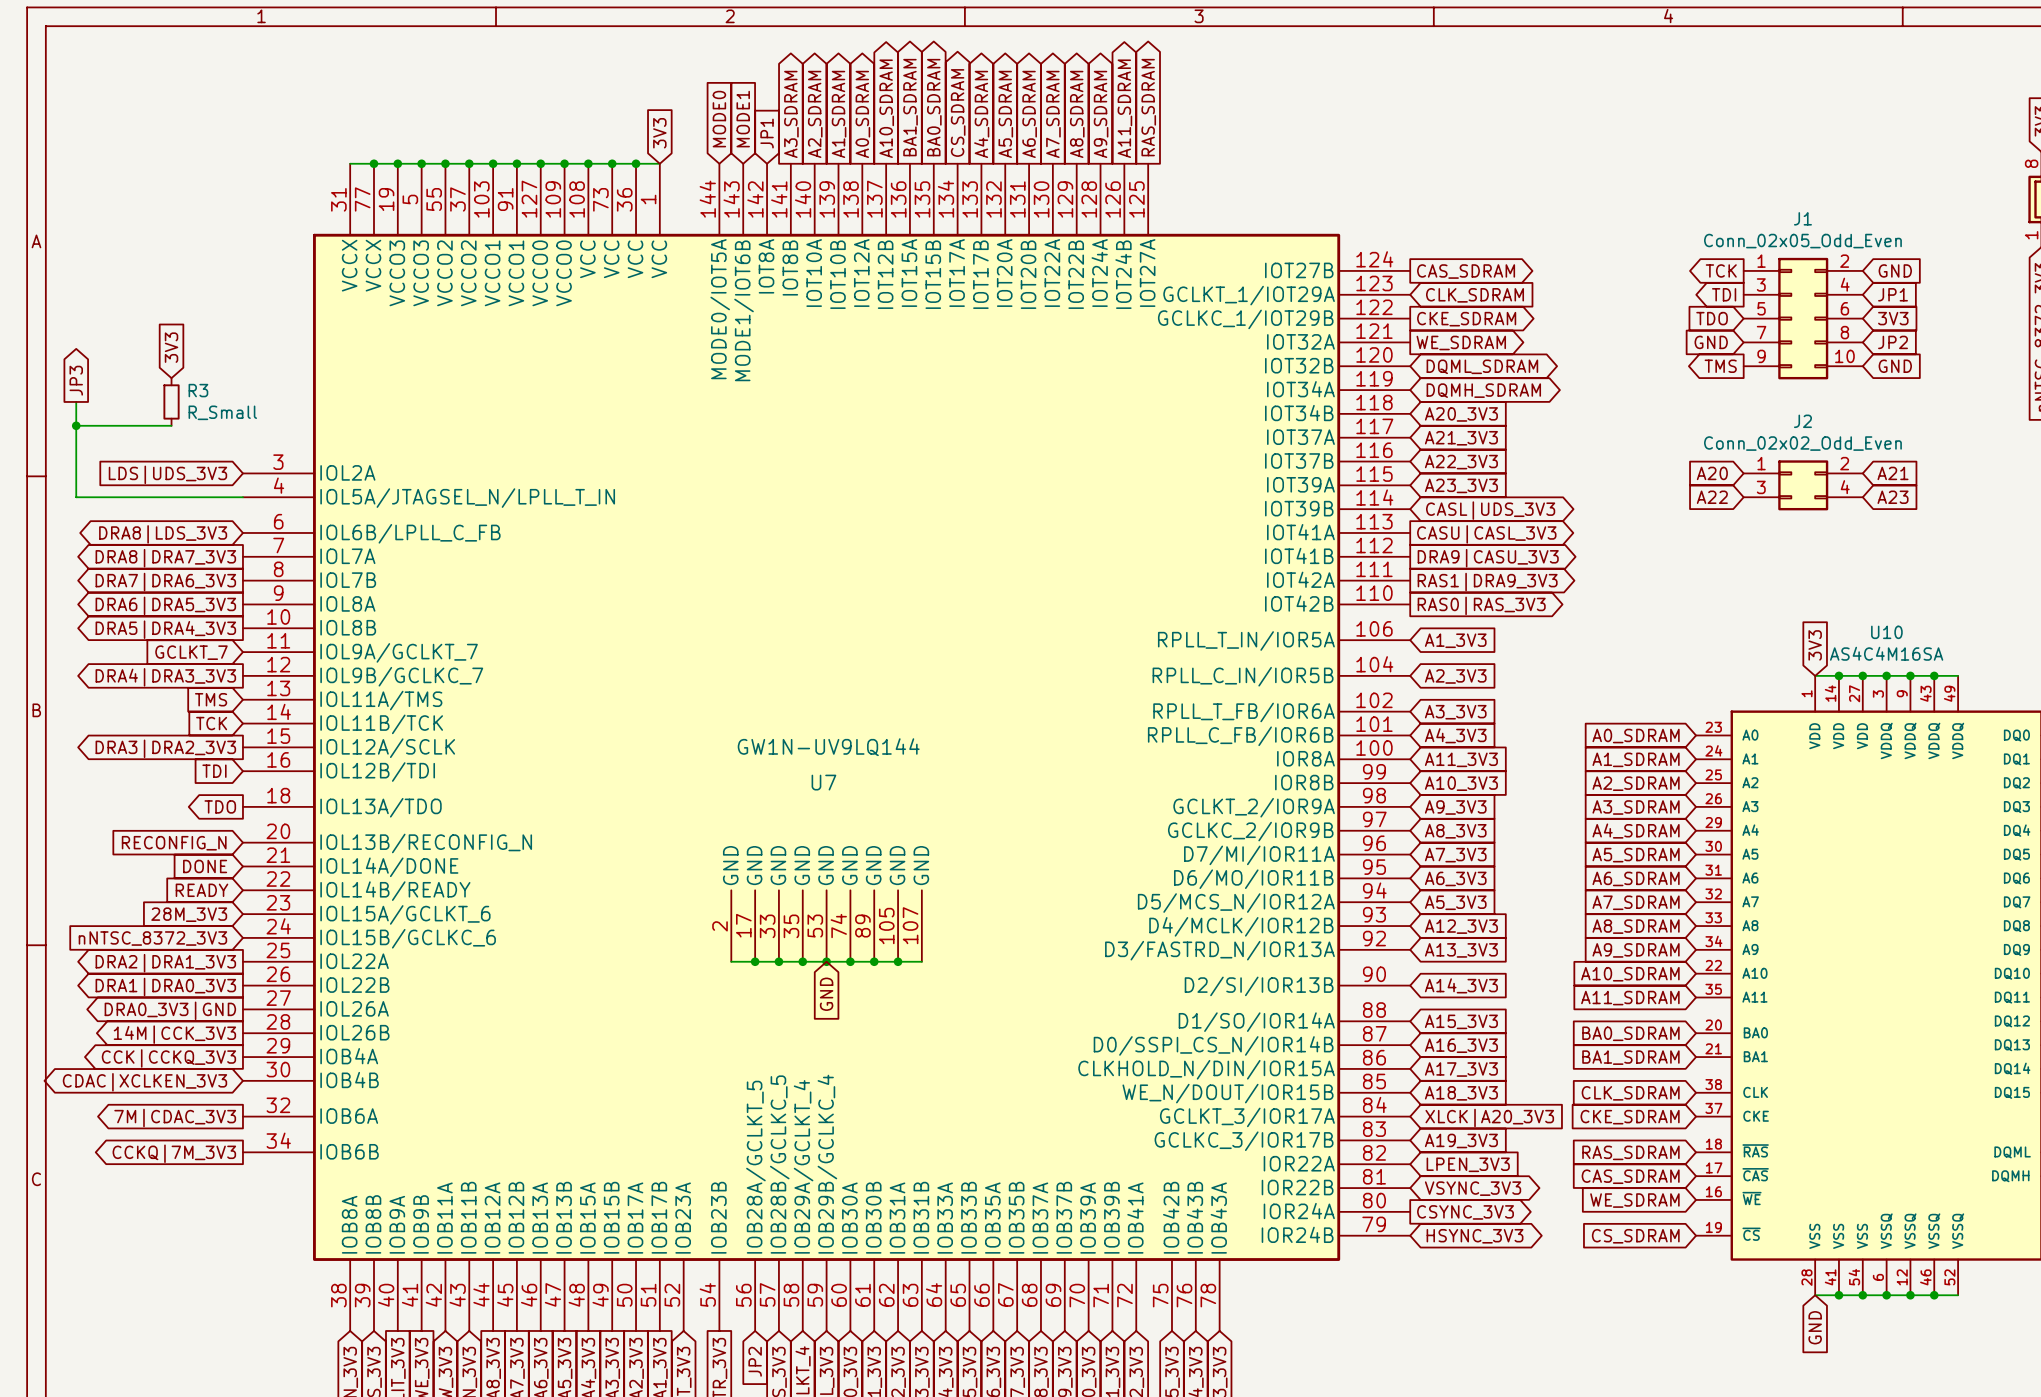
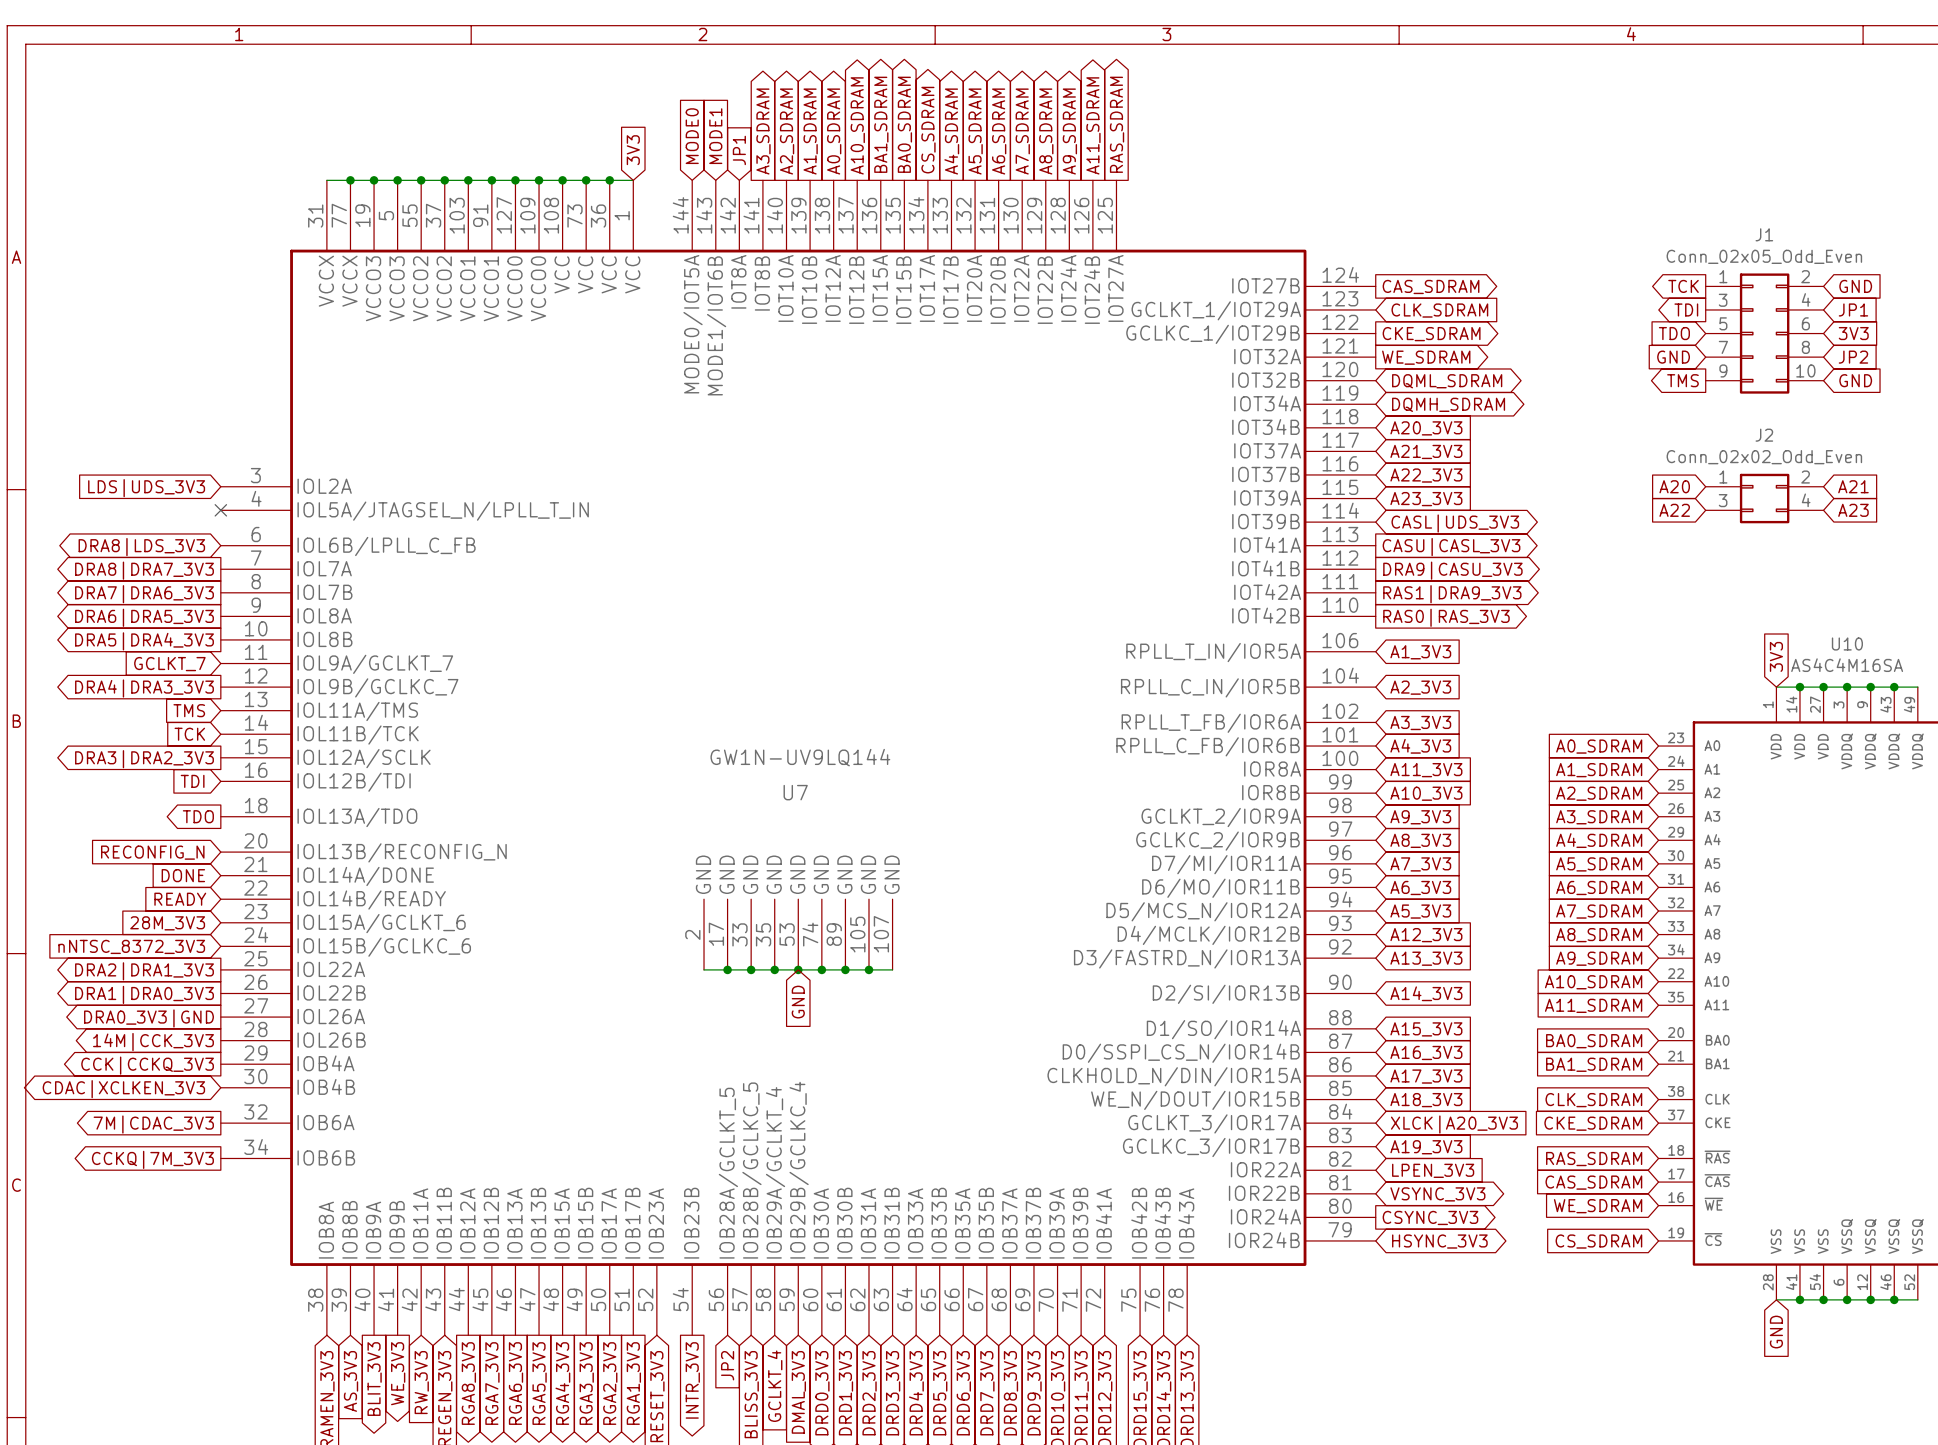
global label: 3V3 (171, 347) -> none
global label: JP3 (76, 380) -> none
wire: (76, 401) (76, 497) (242, 497) -> none
R3: R_Small (171, 401) -> none
wire: (76, 425) (171, 425) -> none
junction: (76, 425) -> none
no-connect mark: none -> (220, 510)

